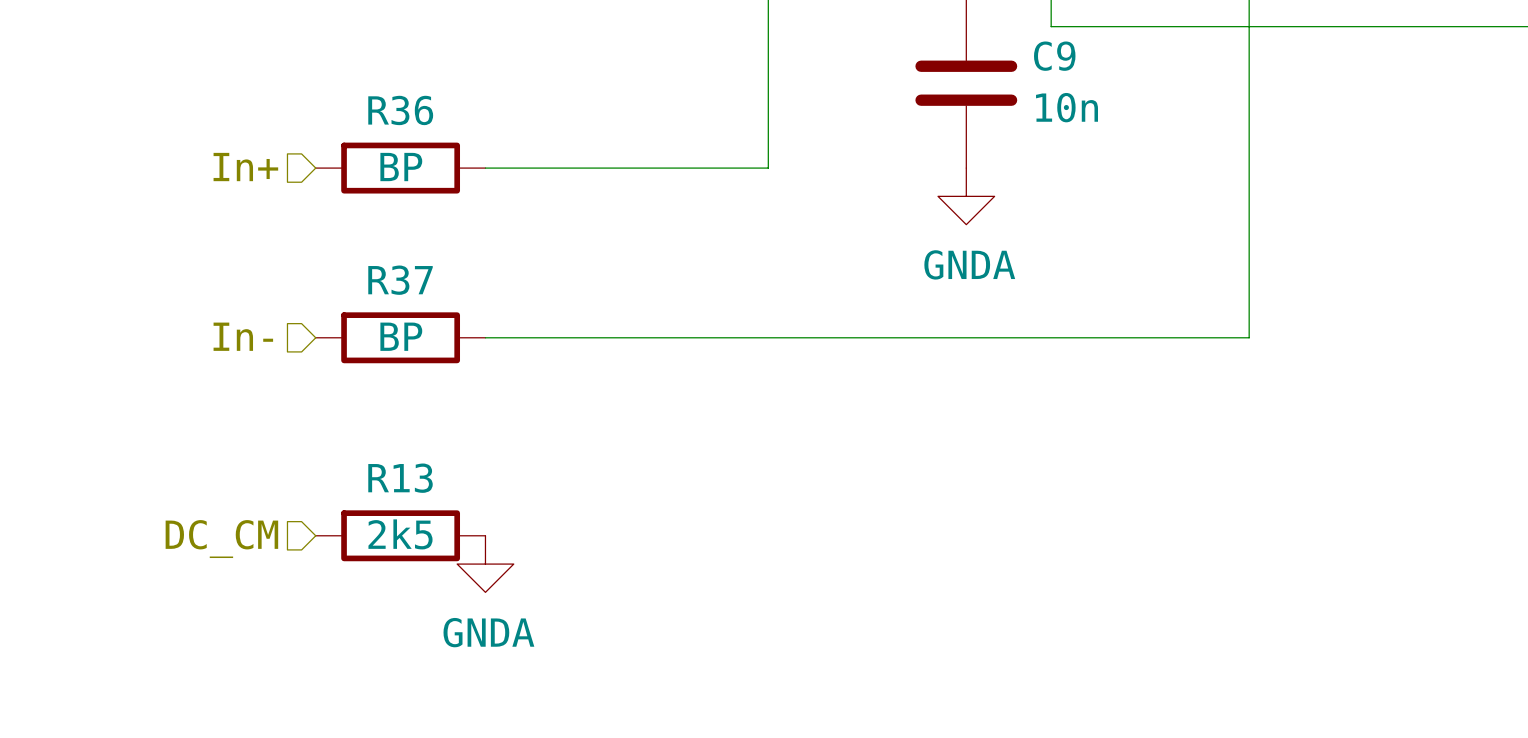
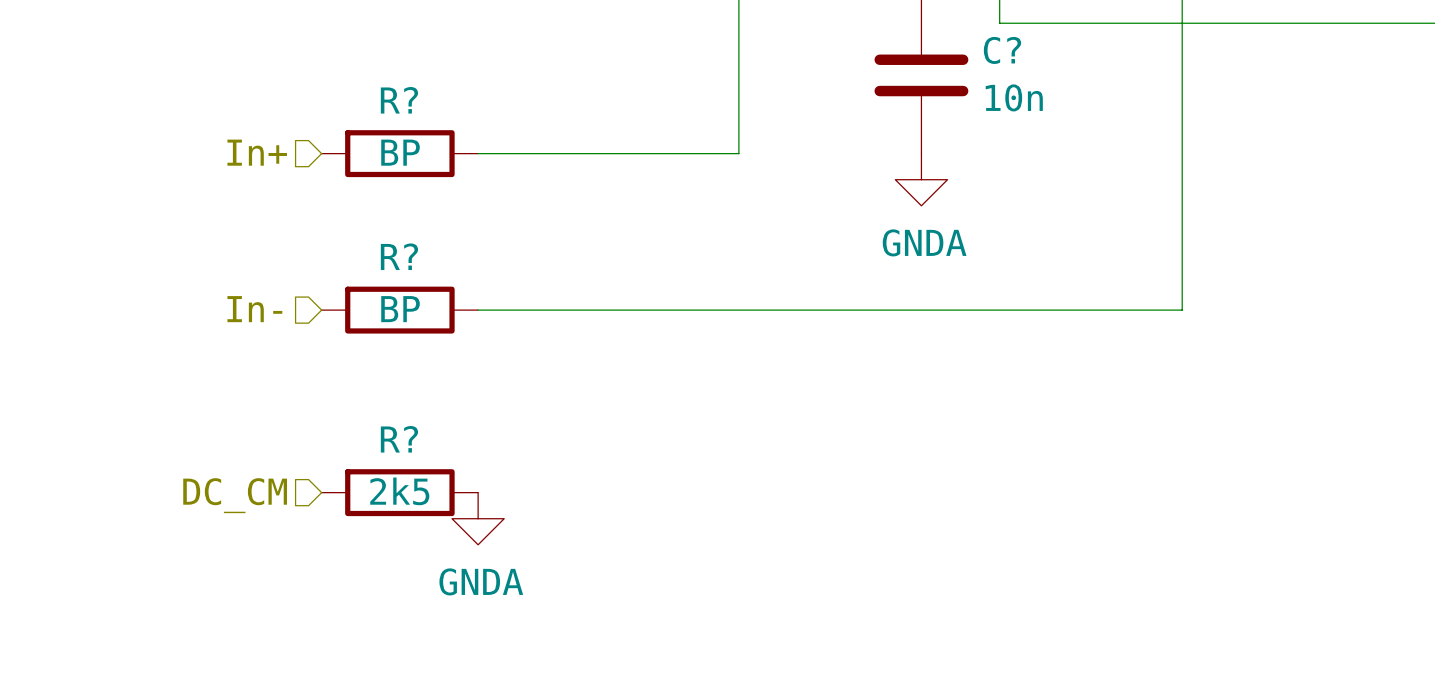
C9 name: C9 (1054, 56) -> C? (1002, 50)
R36 name: R36 (400, 110) -> R? (399, 100)
R37 name: R37 (400, 280) -> R? (399, 256)
R13 name: R13 (400, 478) -> R? (399, 439)

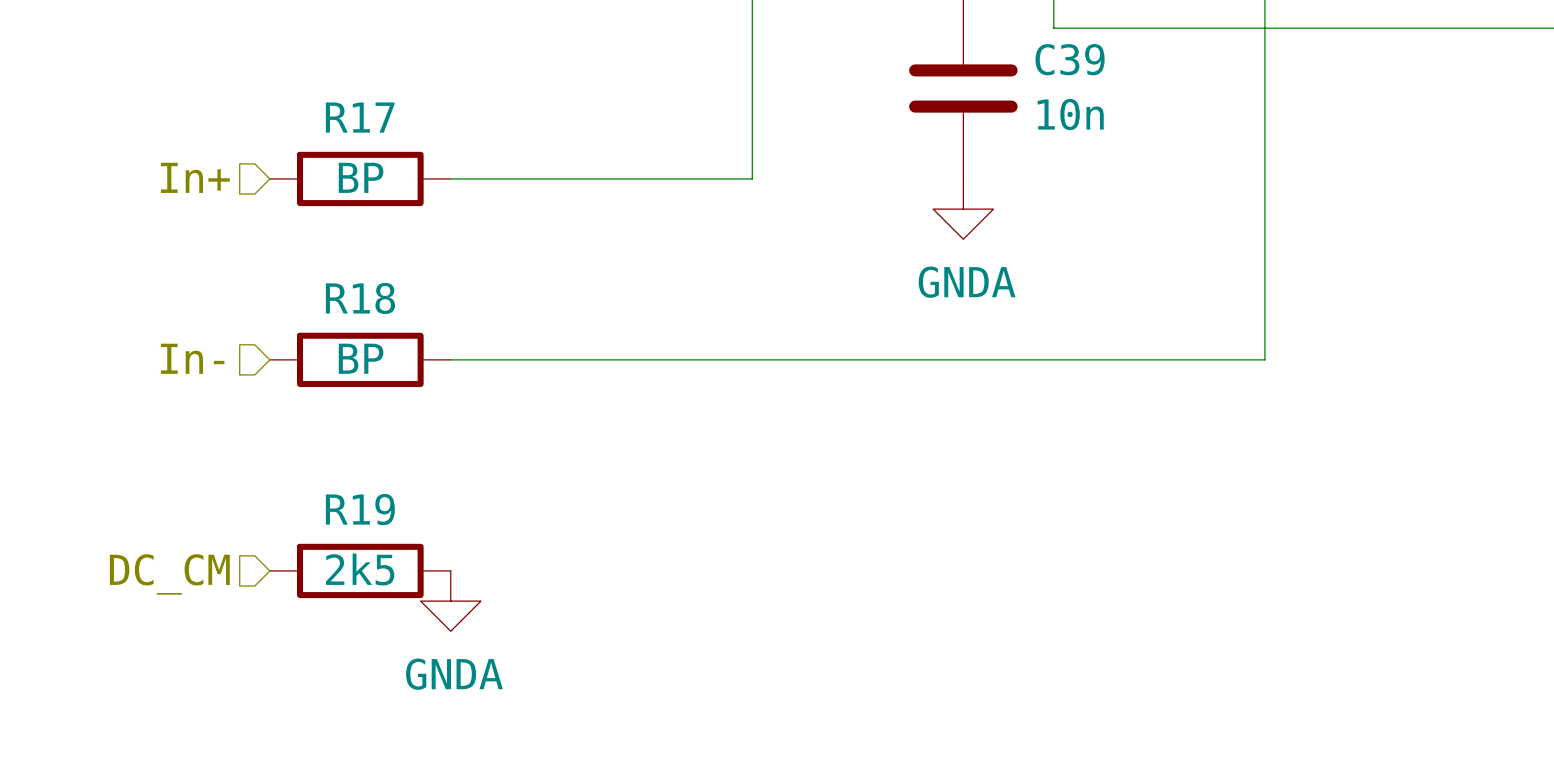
C? name: C? (1002, 50) -> C39 (1070, 59)
R? name: R? (399, 100) -> R17 (360, 117)
R? name: R? (399, 256) -> R18 (360, 298)
R? name: R? (399, 439) -> R19 (360, 509)

